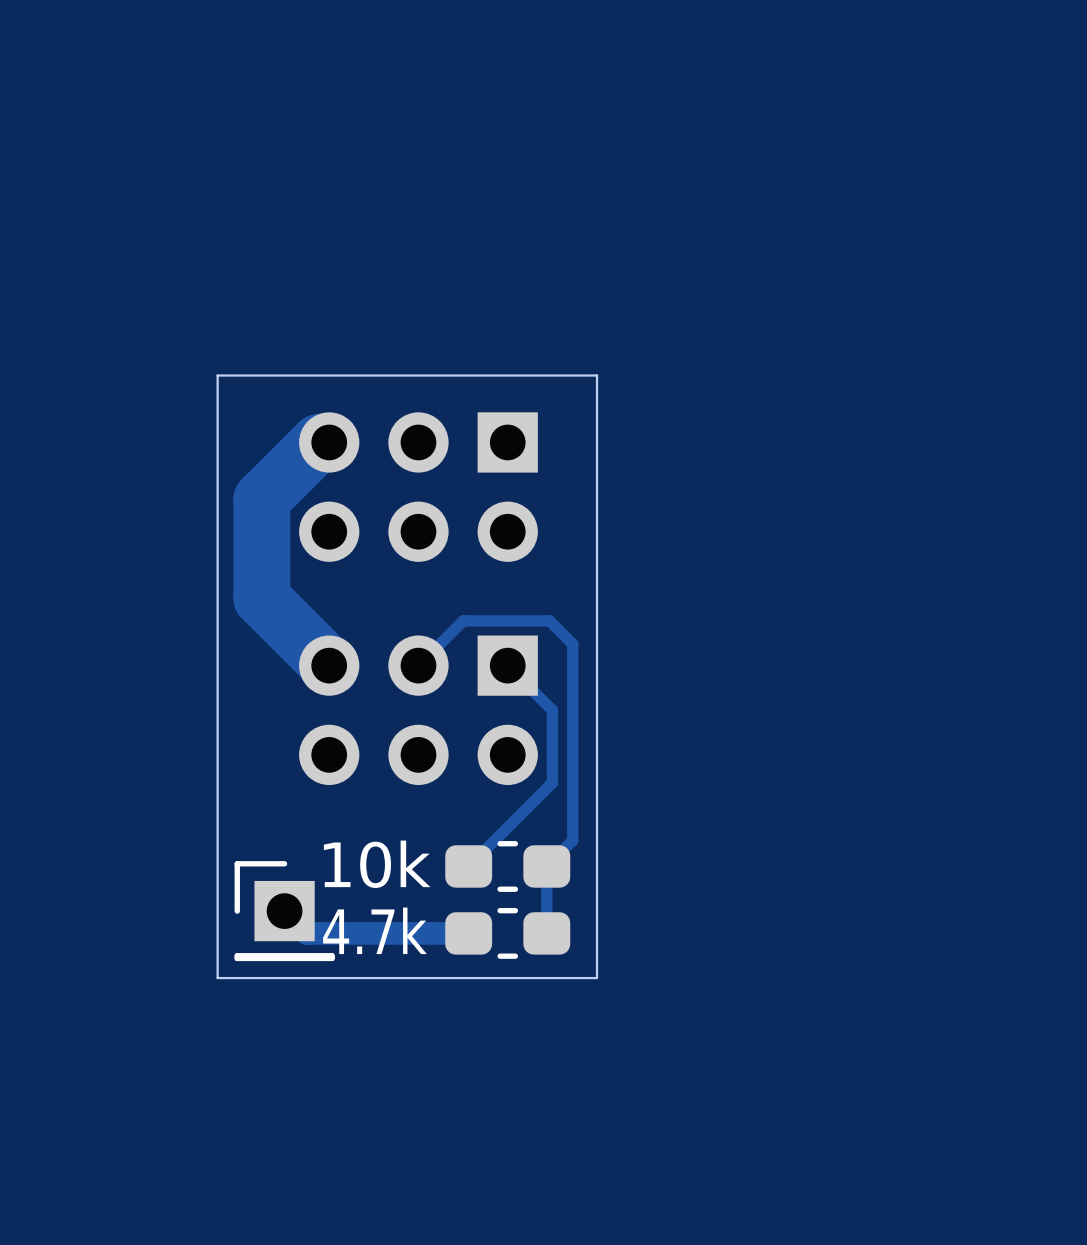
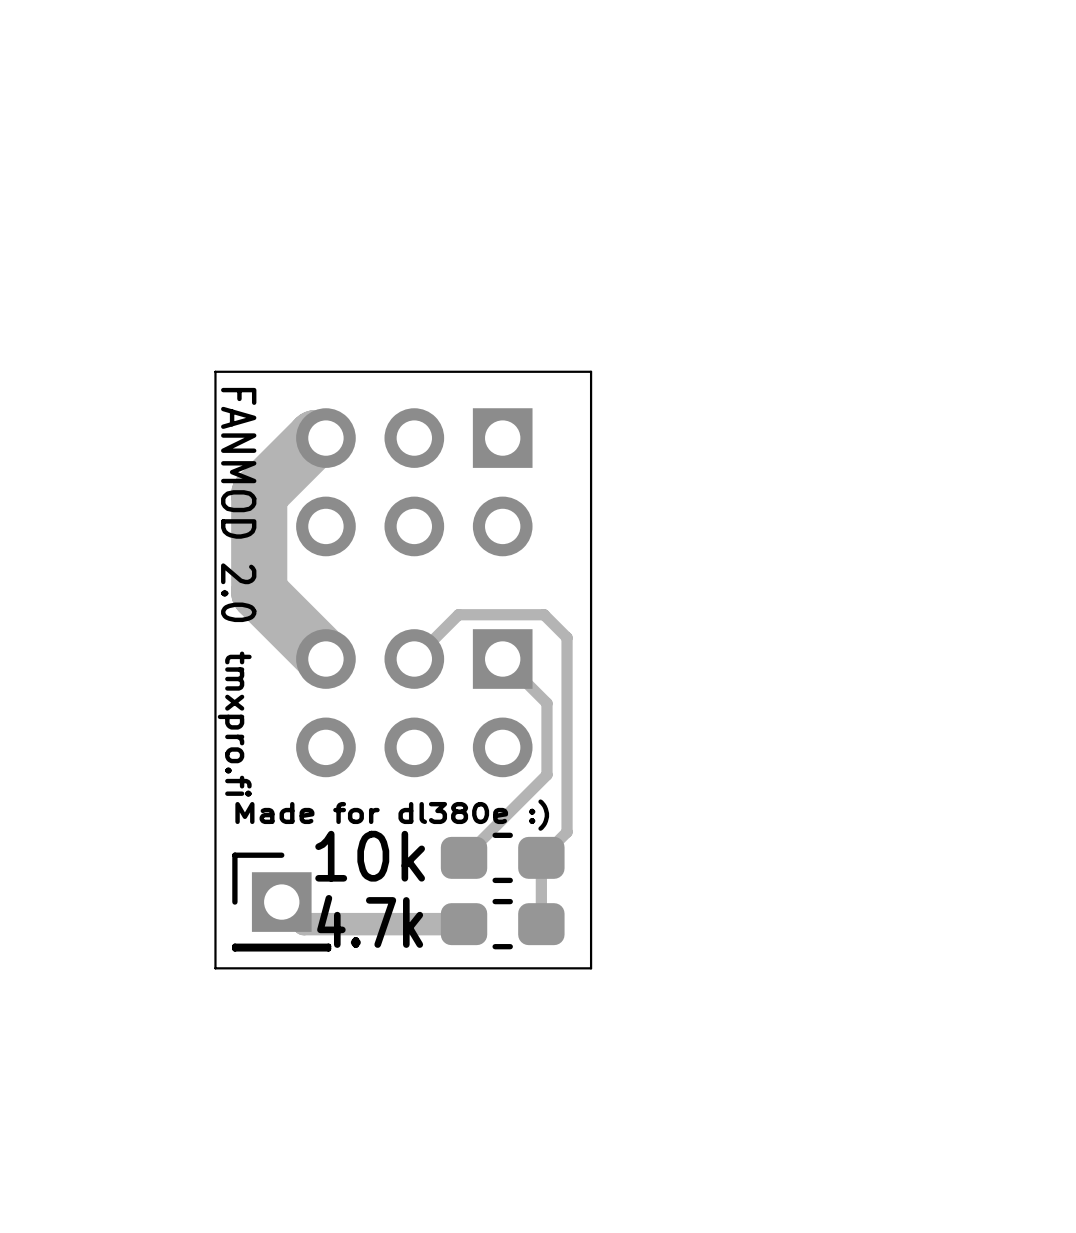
text: none -> FANMOD 2.0 (238, 504)
text: none -> tmxpro.fi (234, 724)
text: none -> Made for dl380e :) (392, 815)

